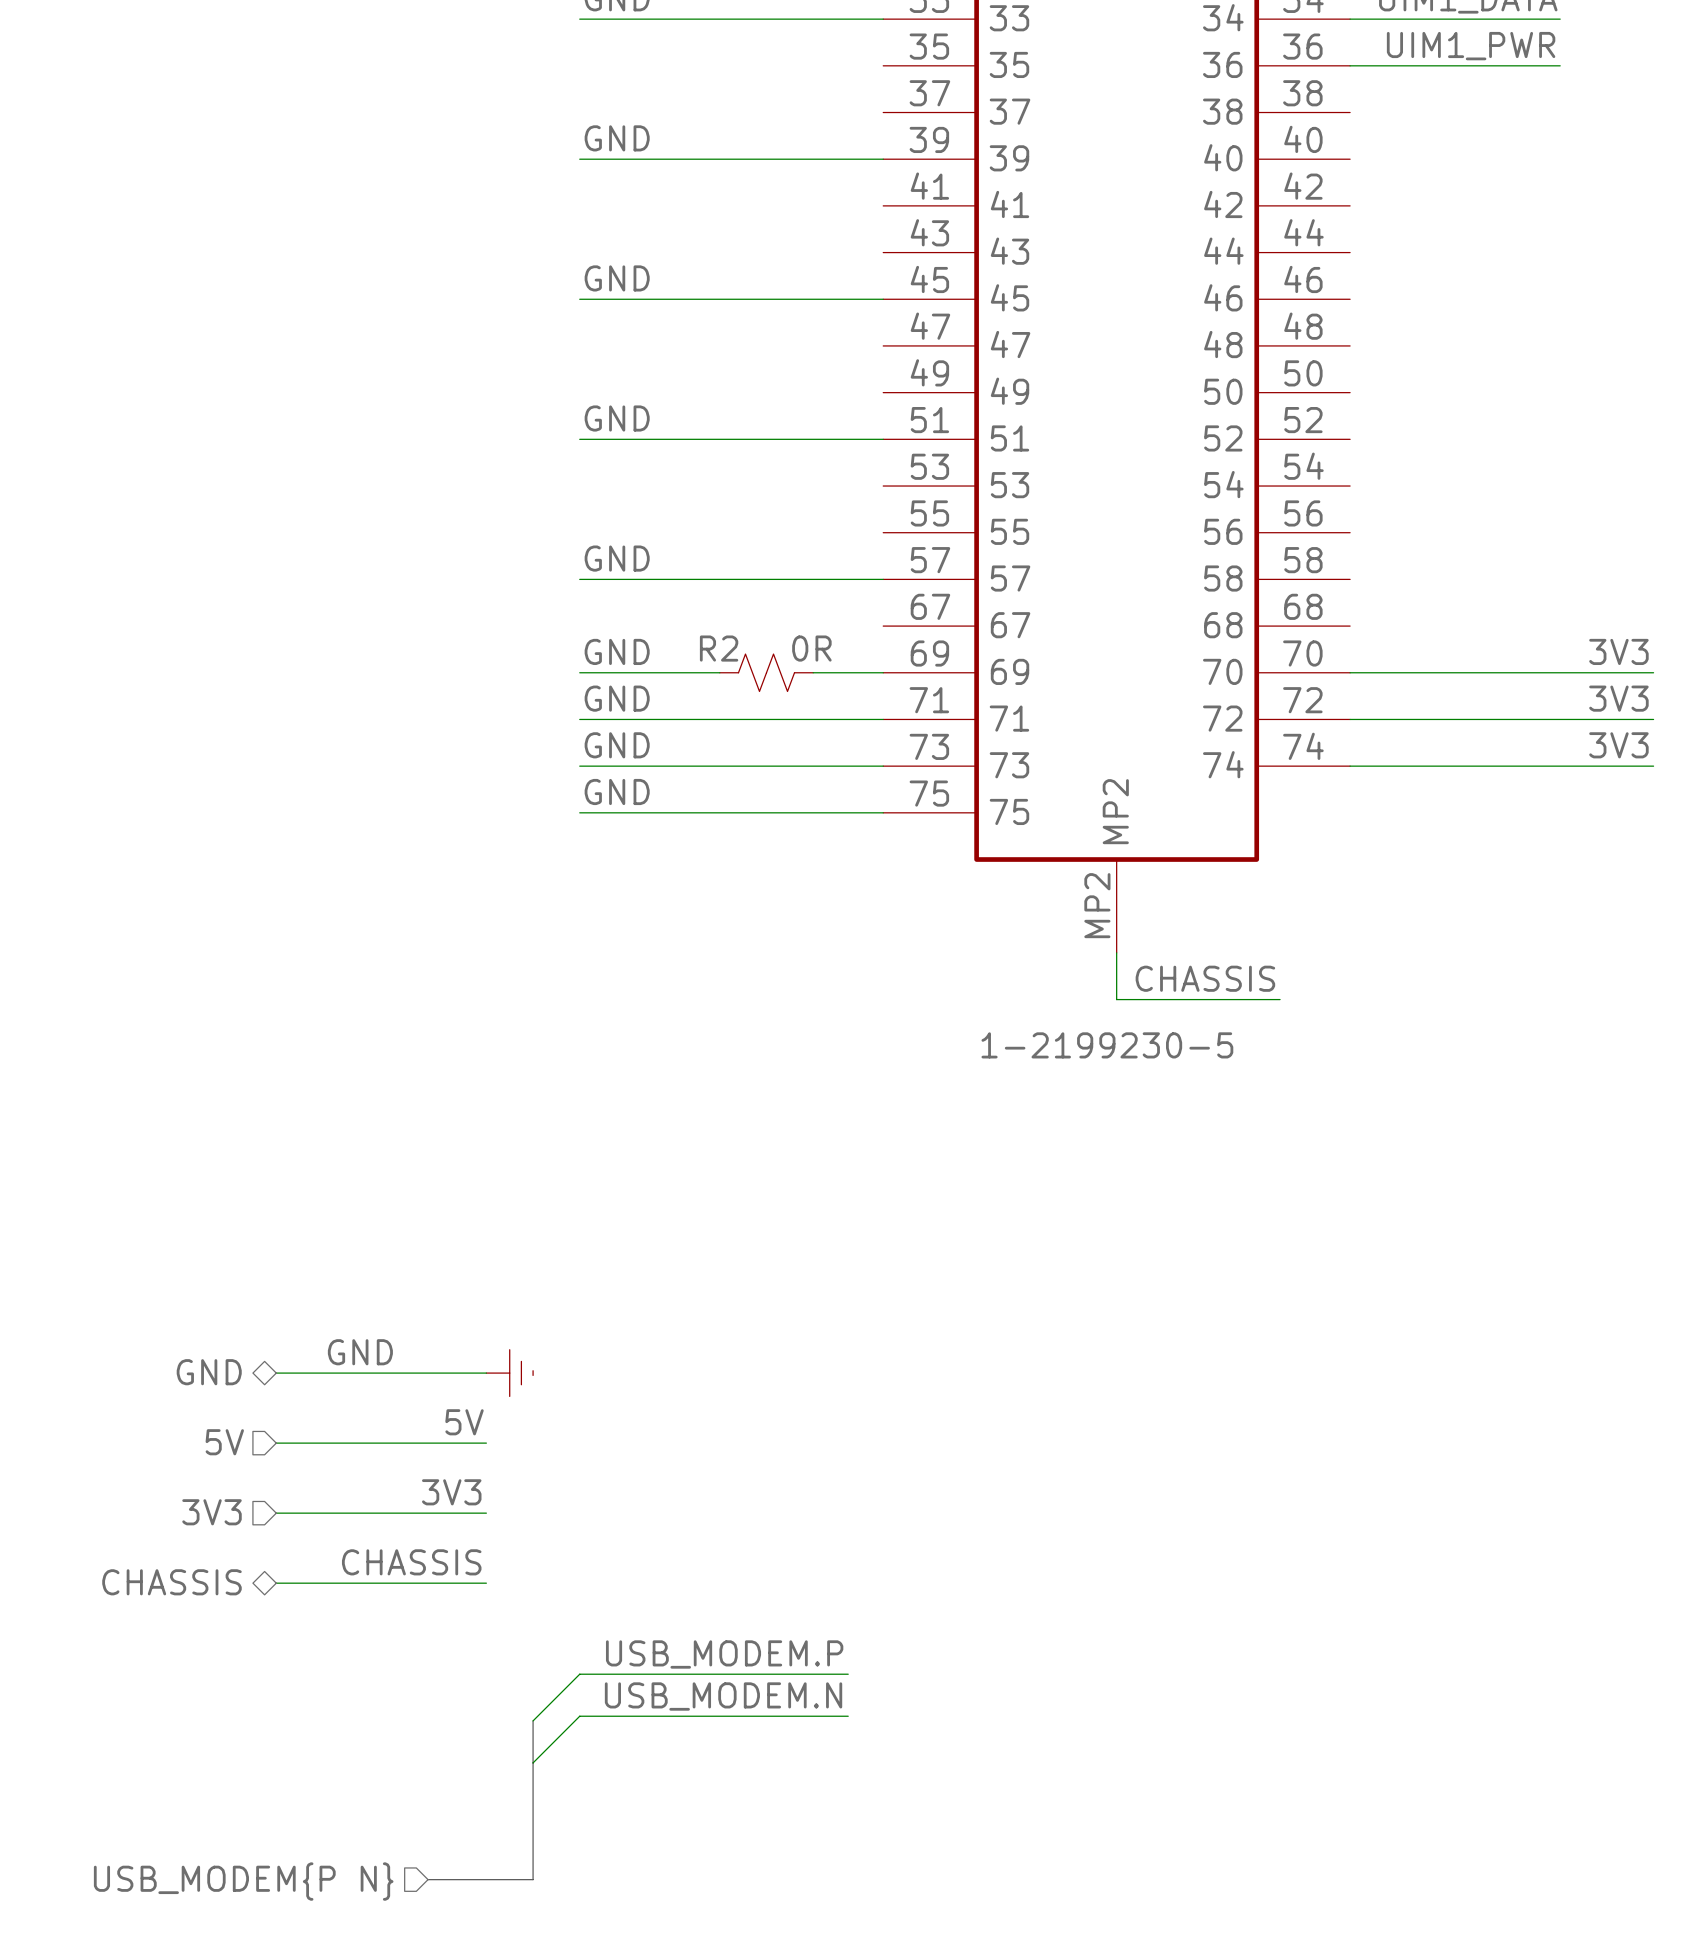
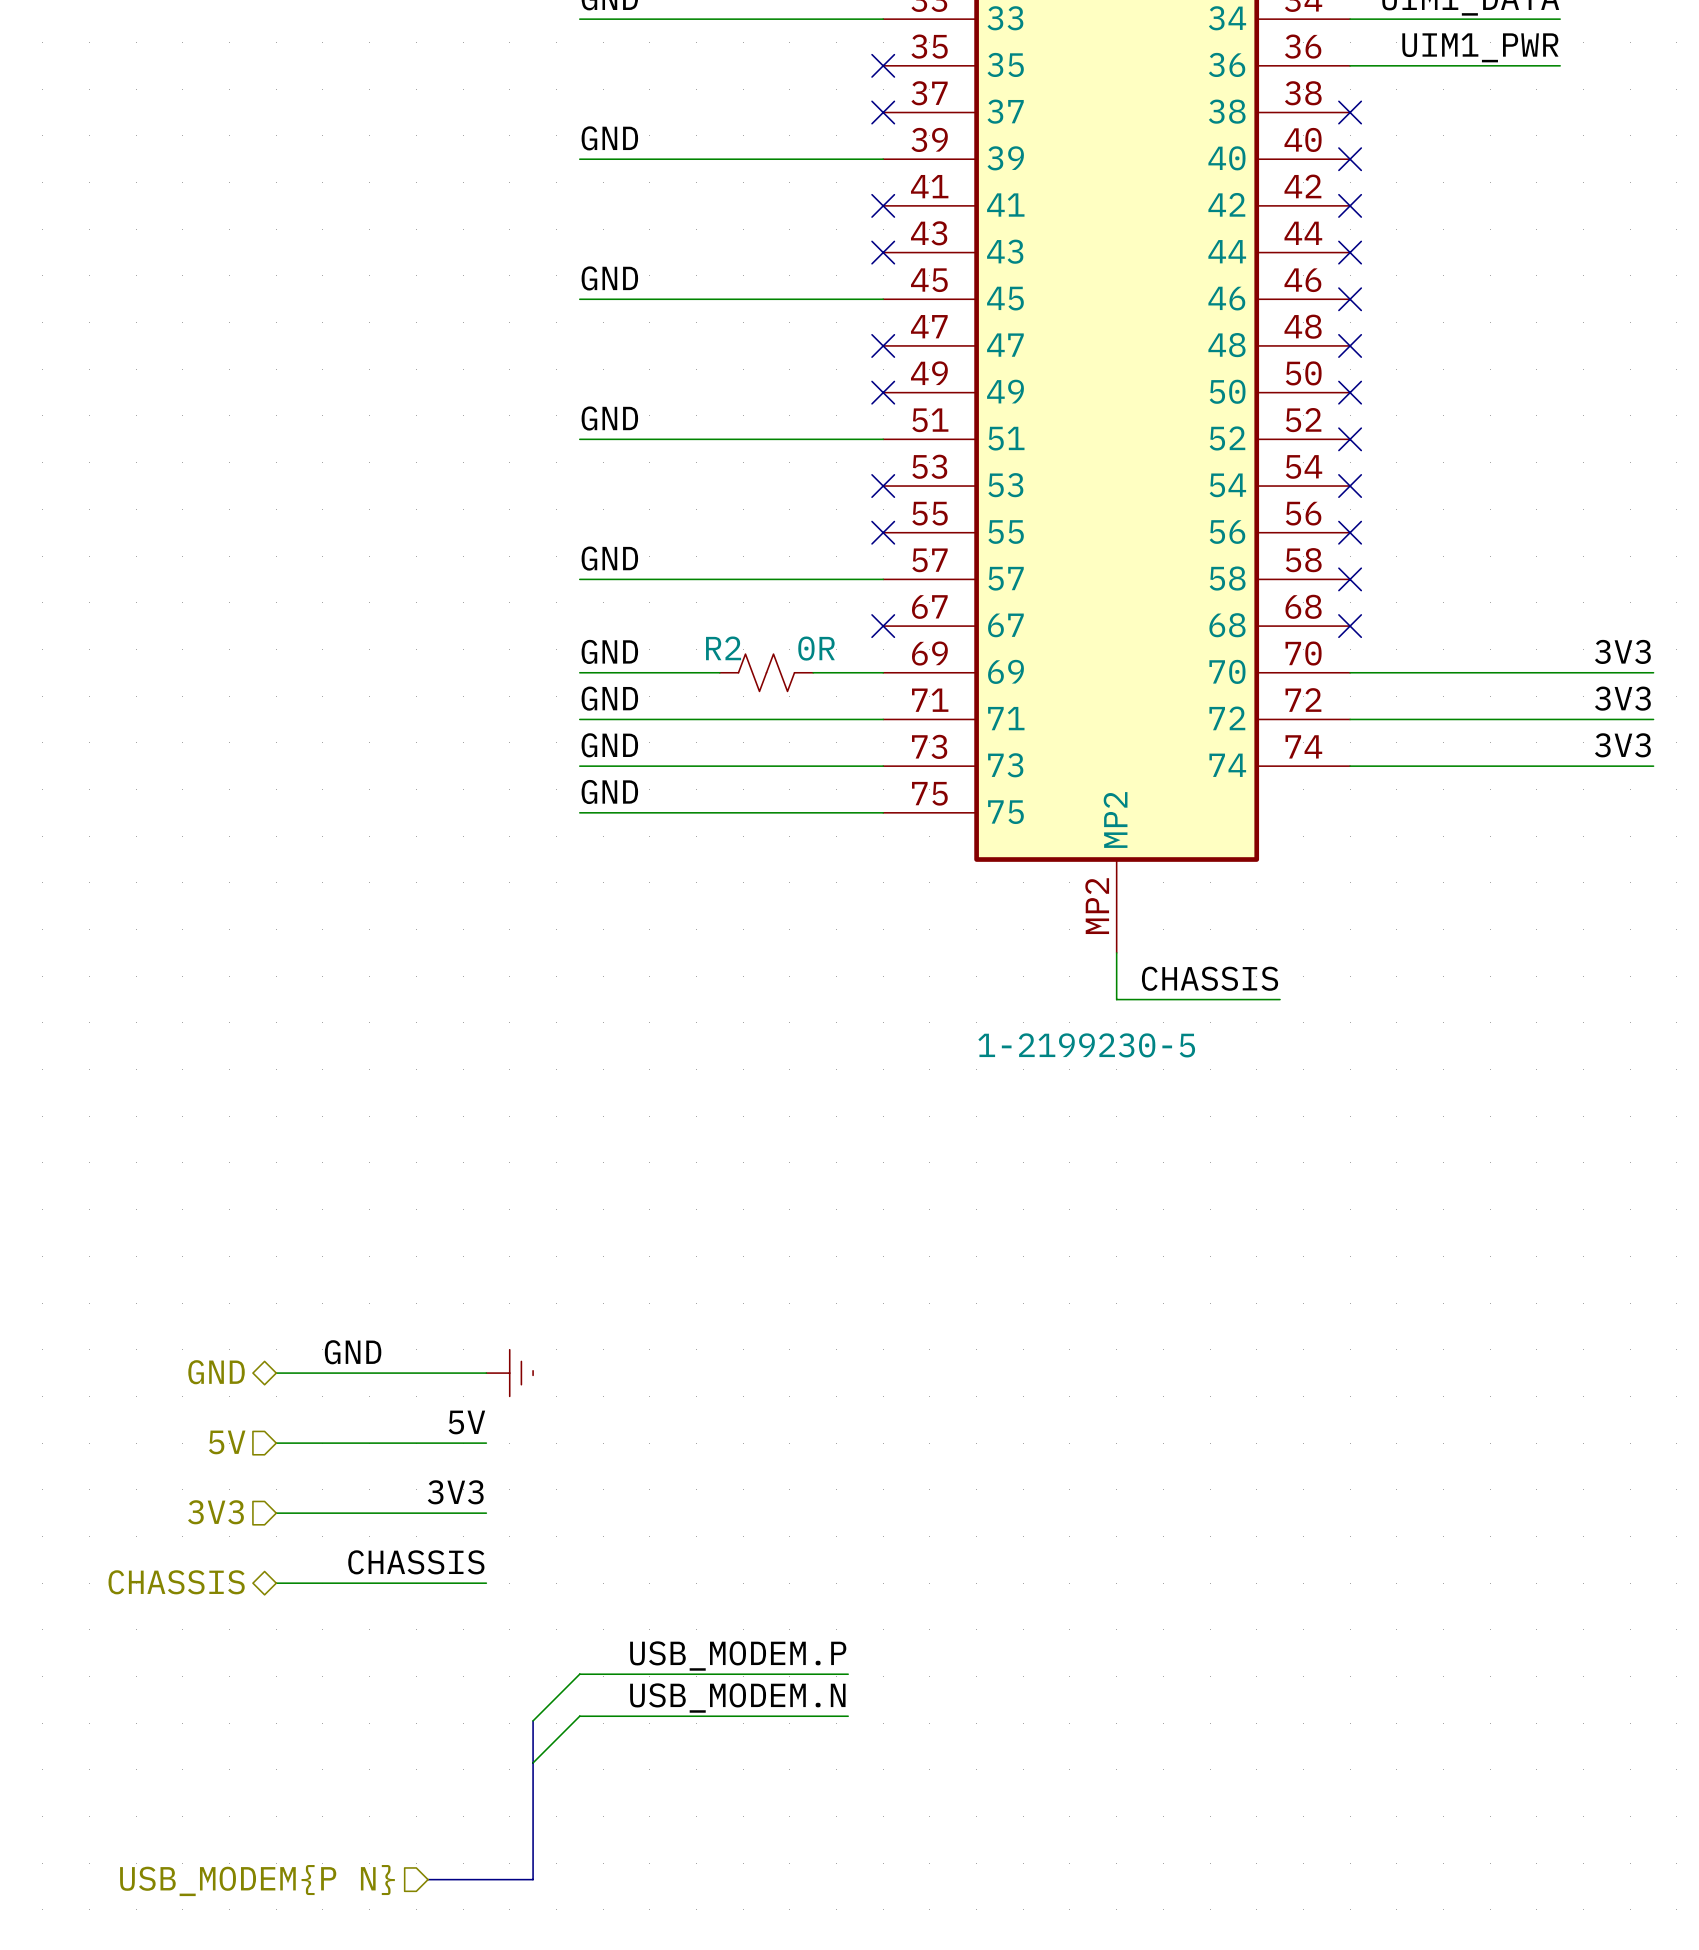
no-connect mark: none -> (883, 65)
no-connect mark: none -> (883, 112)
no-connect mark: none -> (1350, 112)
no-connect mark: none -> (1350, 159)
no-connect mark: none -> (883, 205)
no-connect mark: none -> (1350, 205)
no-connect mark: none -> (883, 252)
no-connect mark: none -> (1350, 252)
no-connect mark: none -> (1350, 299)
no-connect mark: none -> (883, 345)
no-connect mark: none -> (1350, 345)
no-connect mark: none -> (883, 392)
no-connect mark: none -> (1350, 392)
no-connect mark: none -> (1350, 439)
no-connect mark: none -> (883, 486)
no-connect mark: none -> (1350, 486)
no-connect mark: none -> (883, 532)
no-connect mark: none -> (1350, 532)
no-connect mark: none -> (1350, 579)
no-connect mark: none -> (883, 626)
no-connect mark: none -> (1350, 626)

